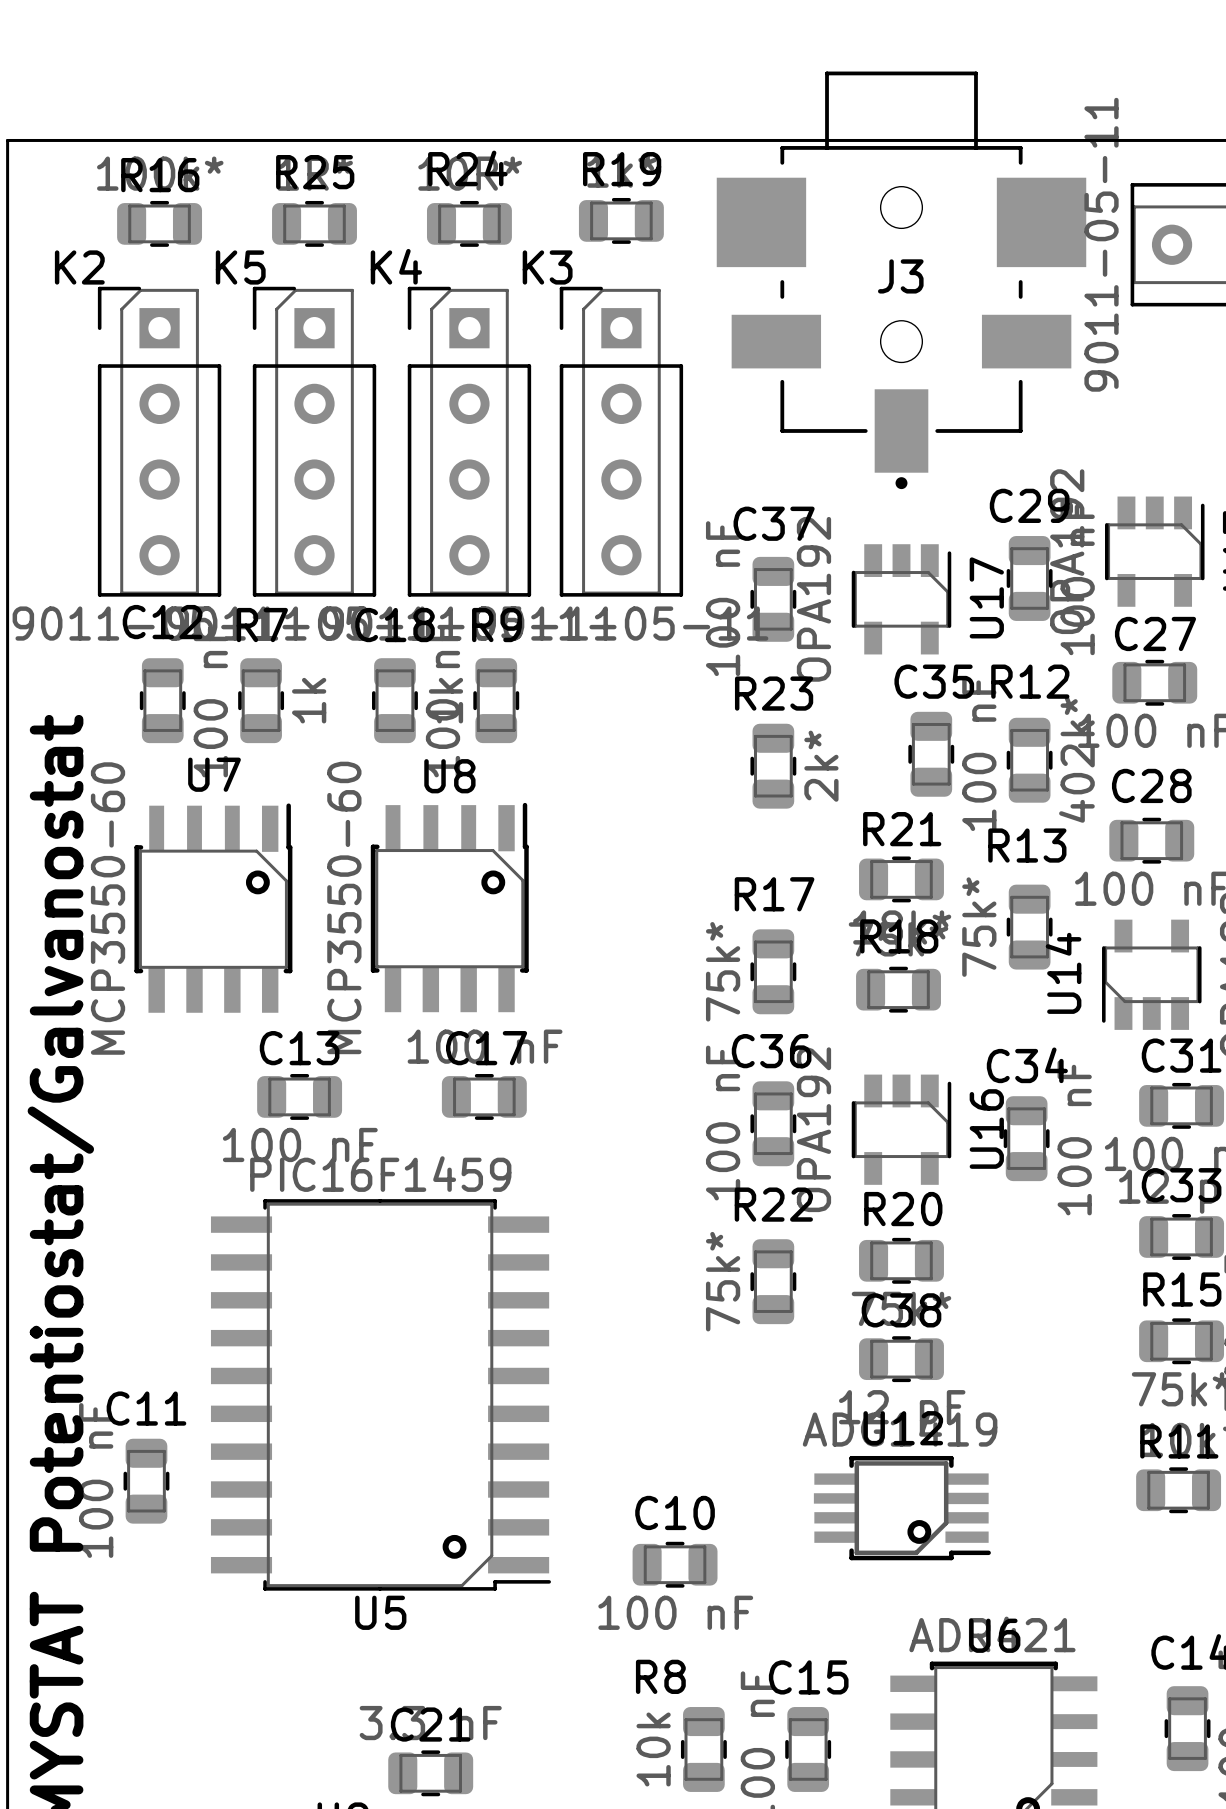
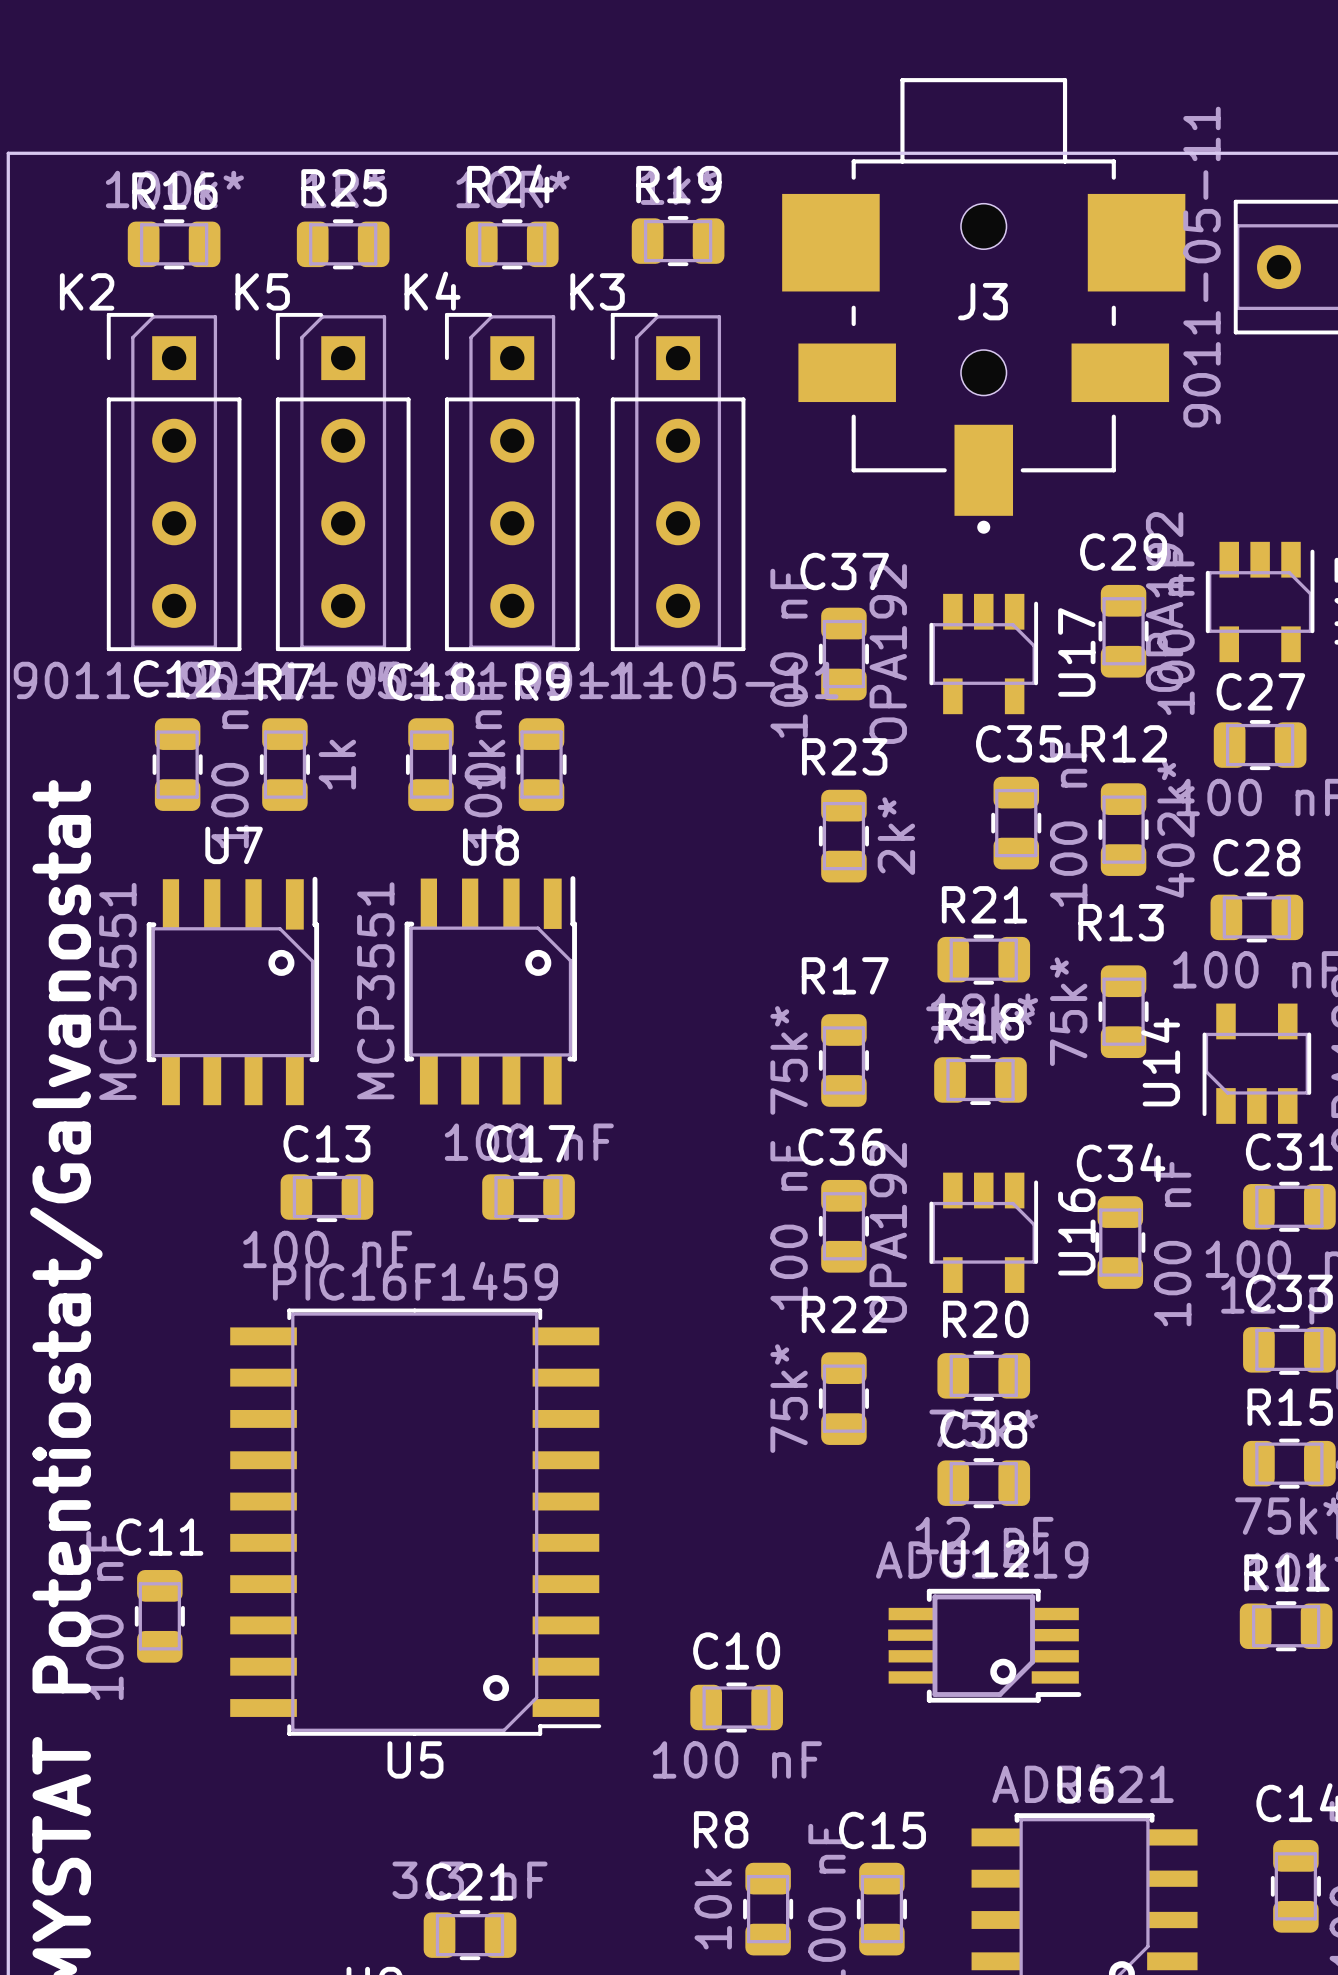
U8 value: MCP3550-60 (344, 907) -> MCP3551 (375, 990)
U7 value: MCP3550-60 (108, 908) -> MCP3551 (117, 991)

